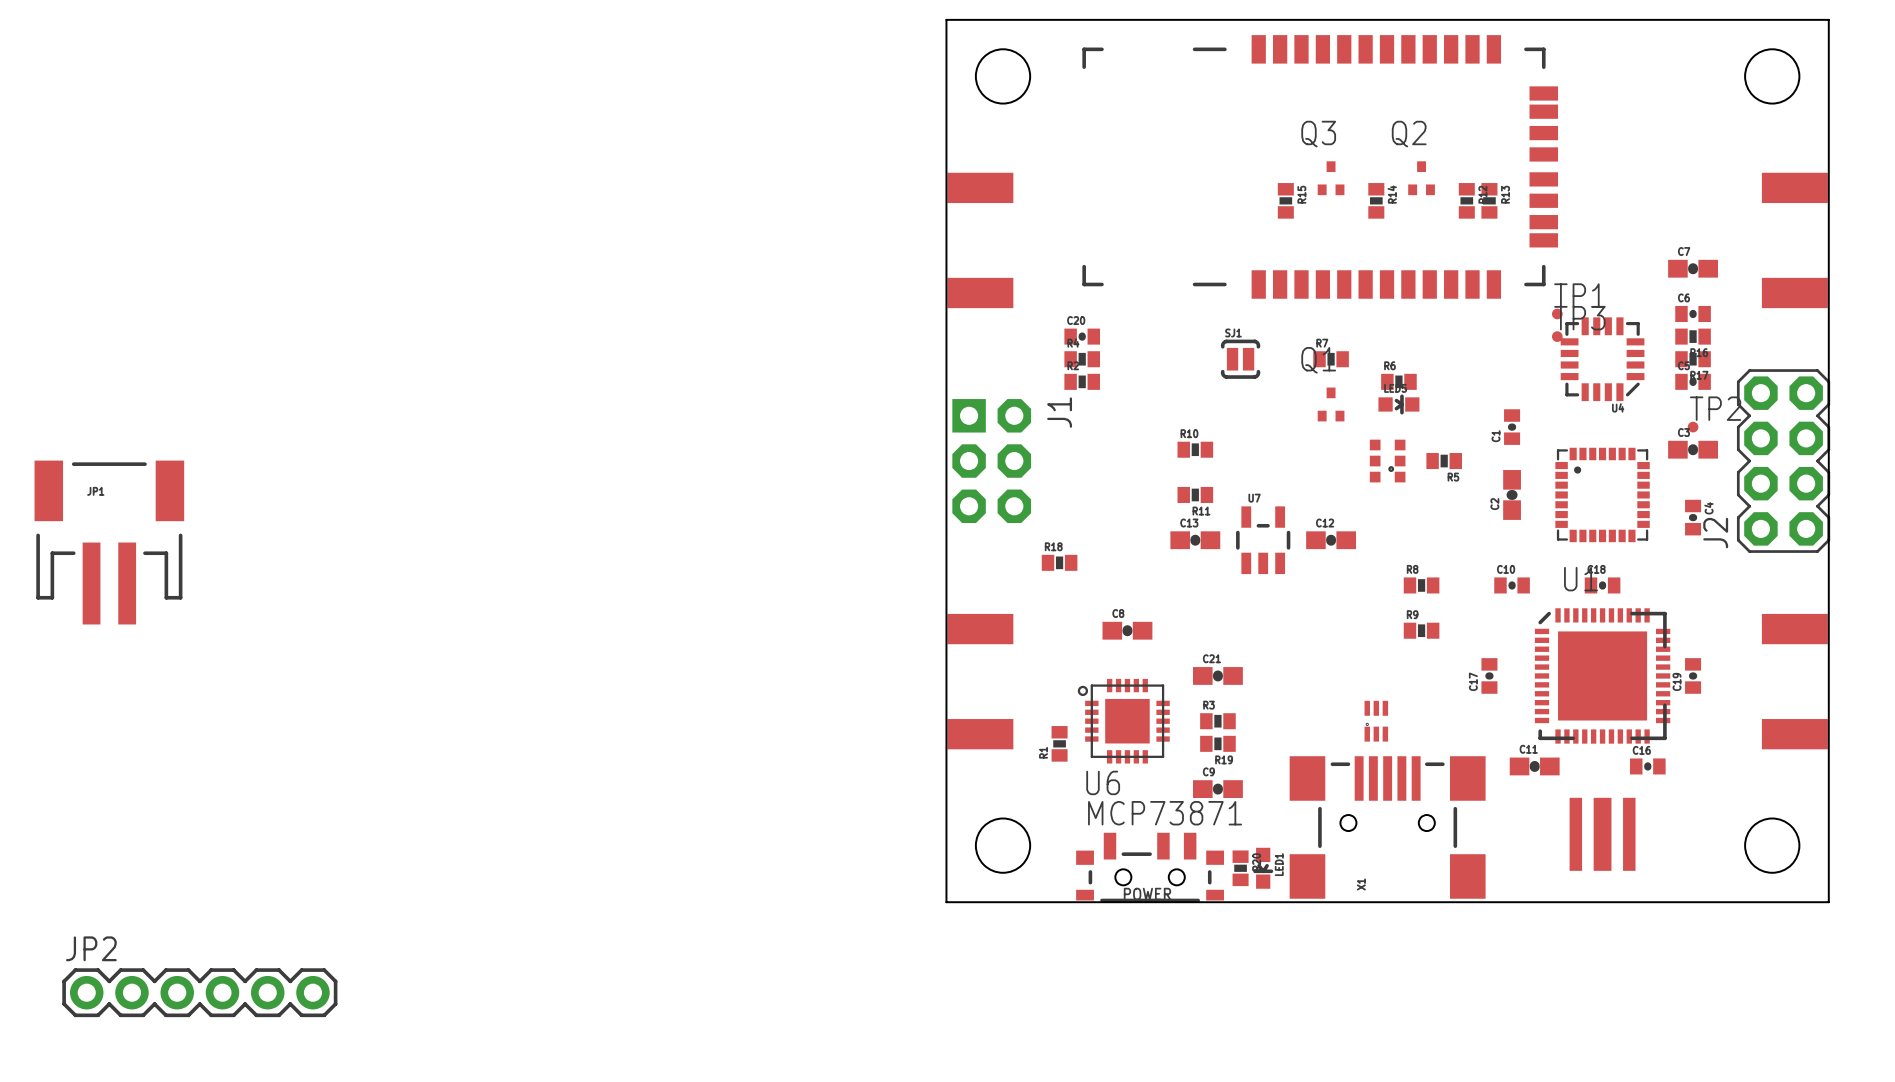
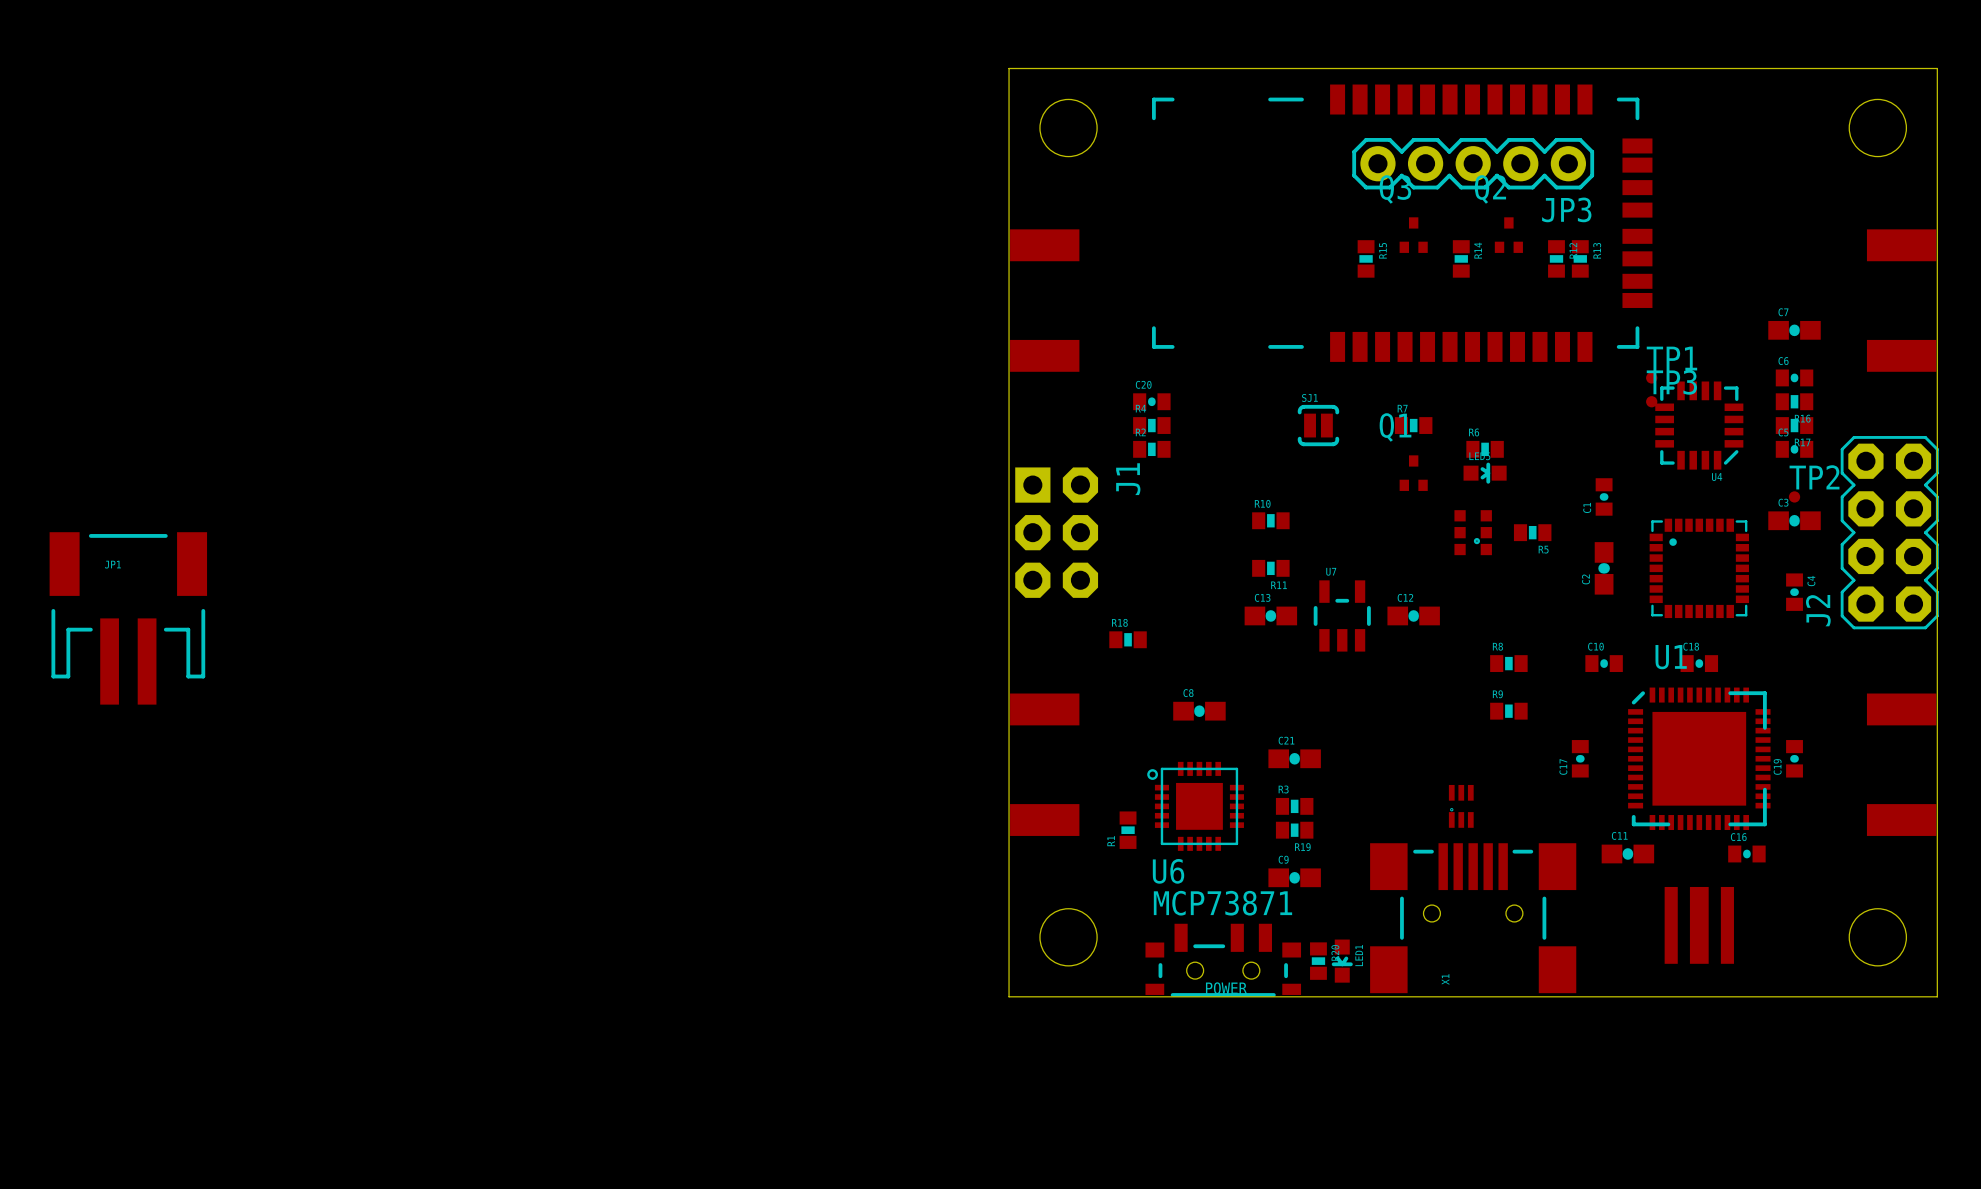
JP3: none -> (1473, 163)
JP2: (199, 992) -> none

